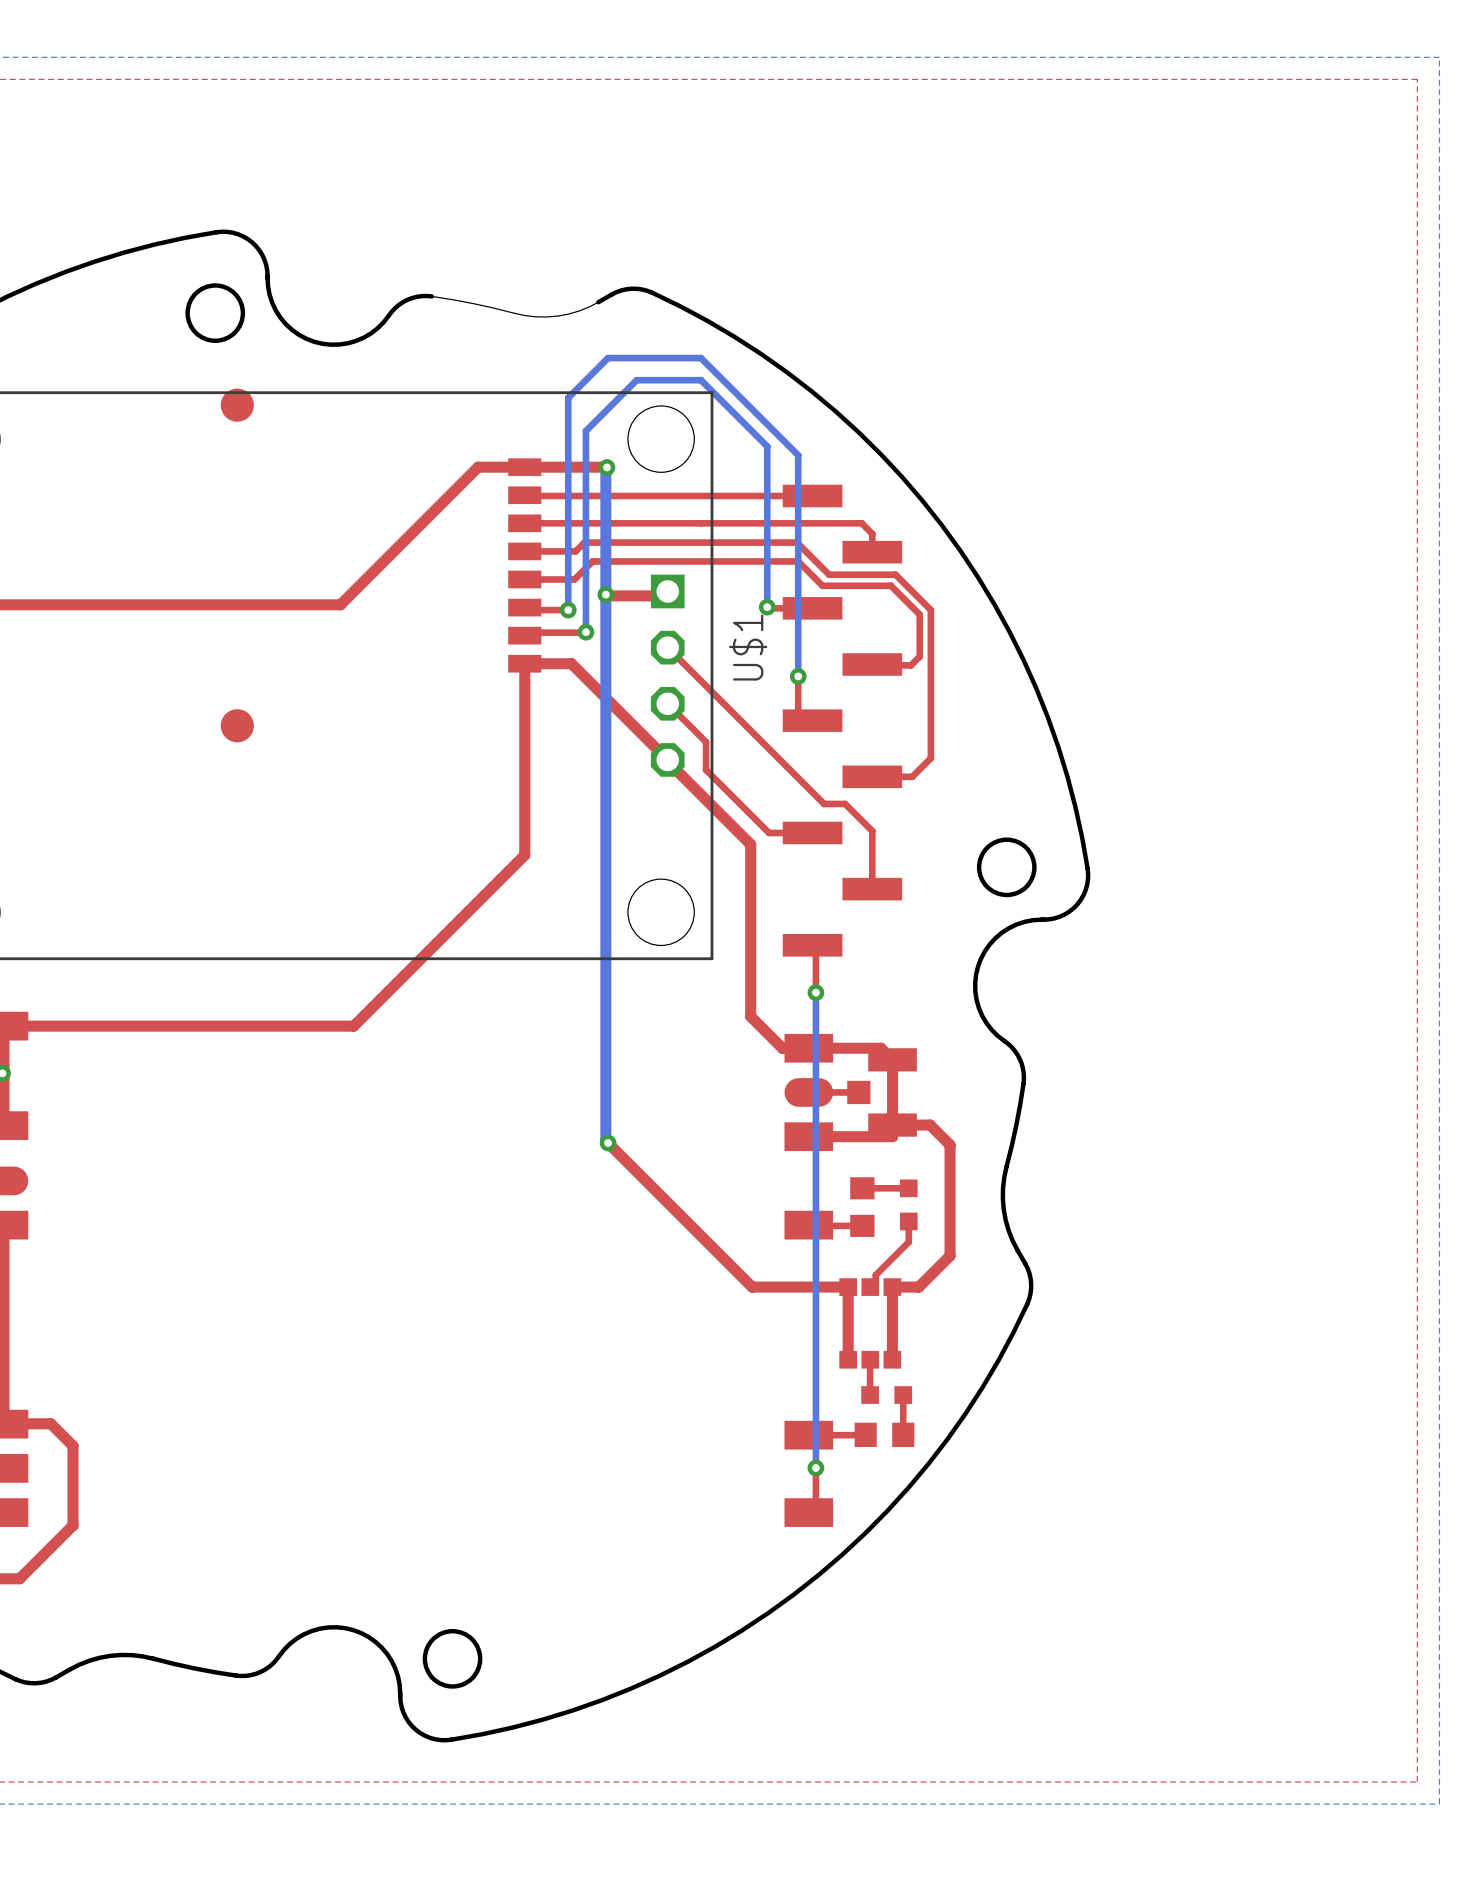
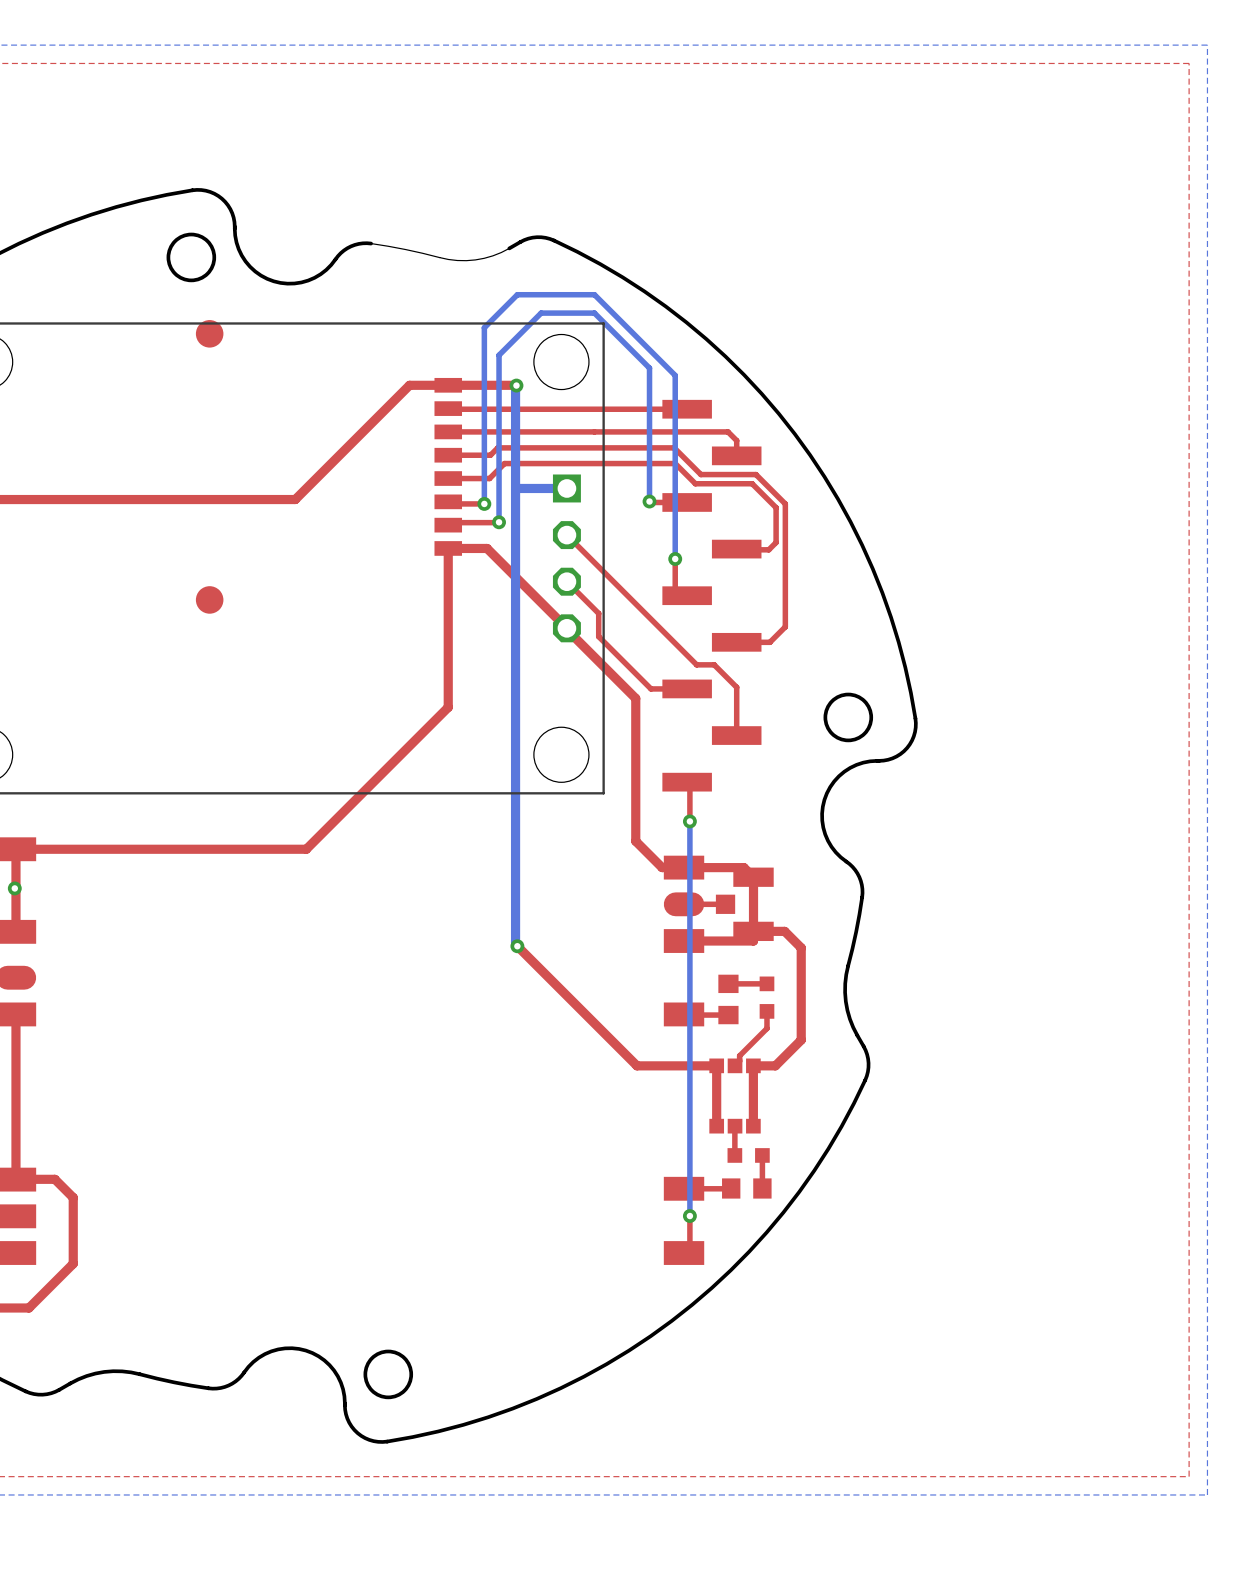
top track: (667, 591) (663, 595) (605, 594) -> none
bottom track: none -> (566, 488) (515, 489)
via: (605, 594) -> none
U$1 name: U$1 (748, 647) -> none

